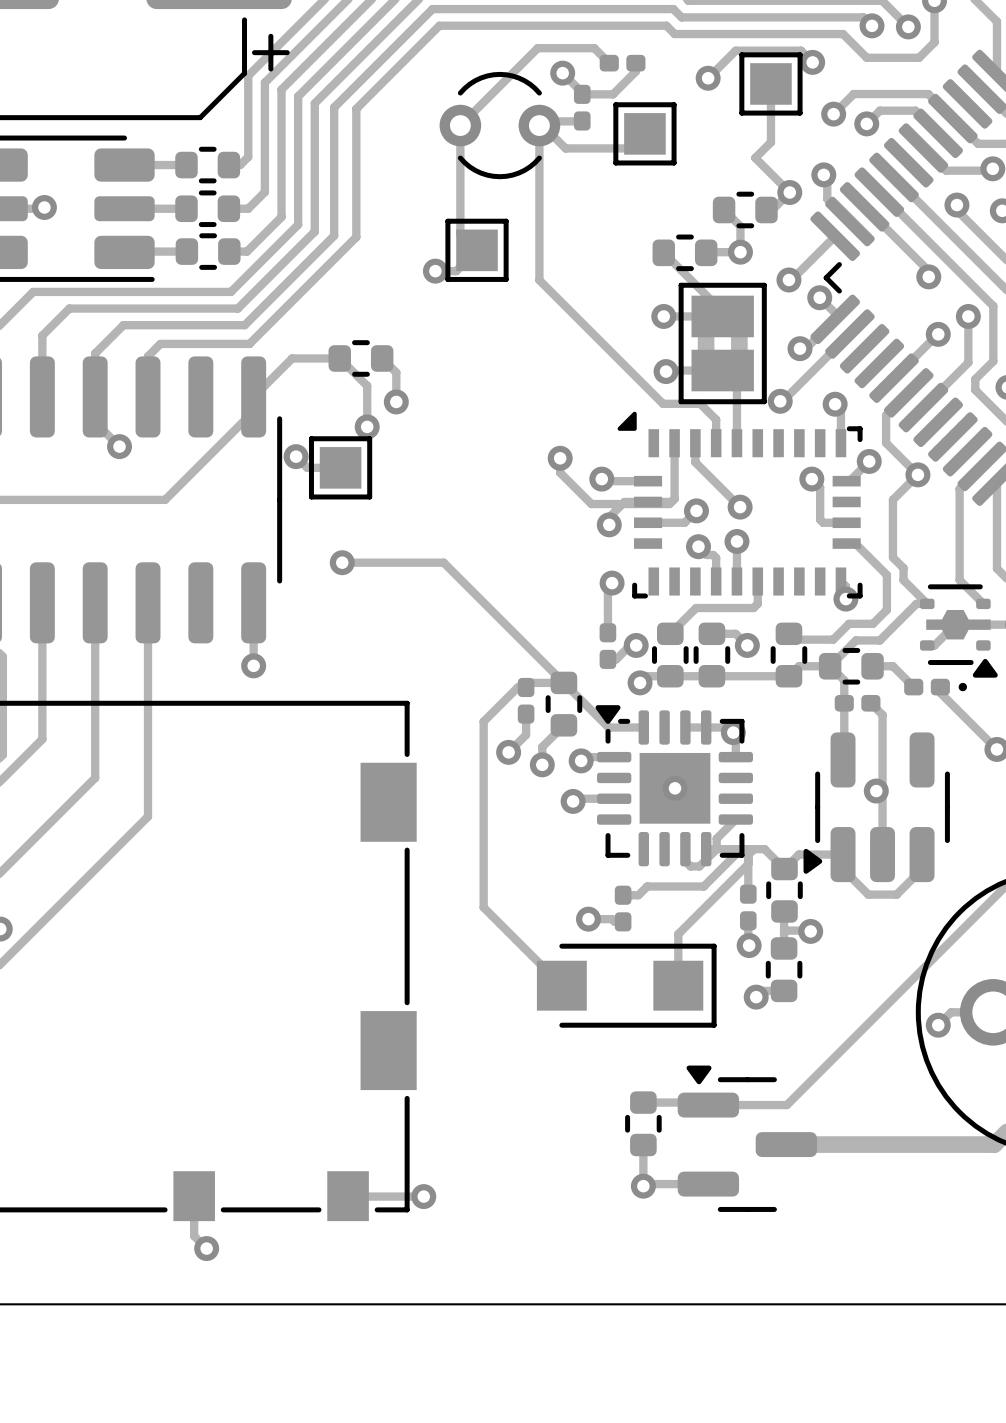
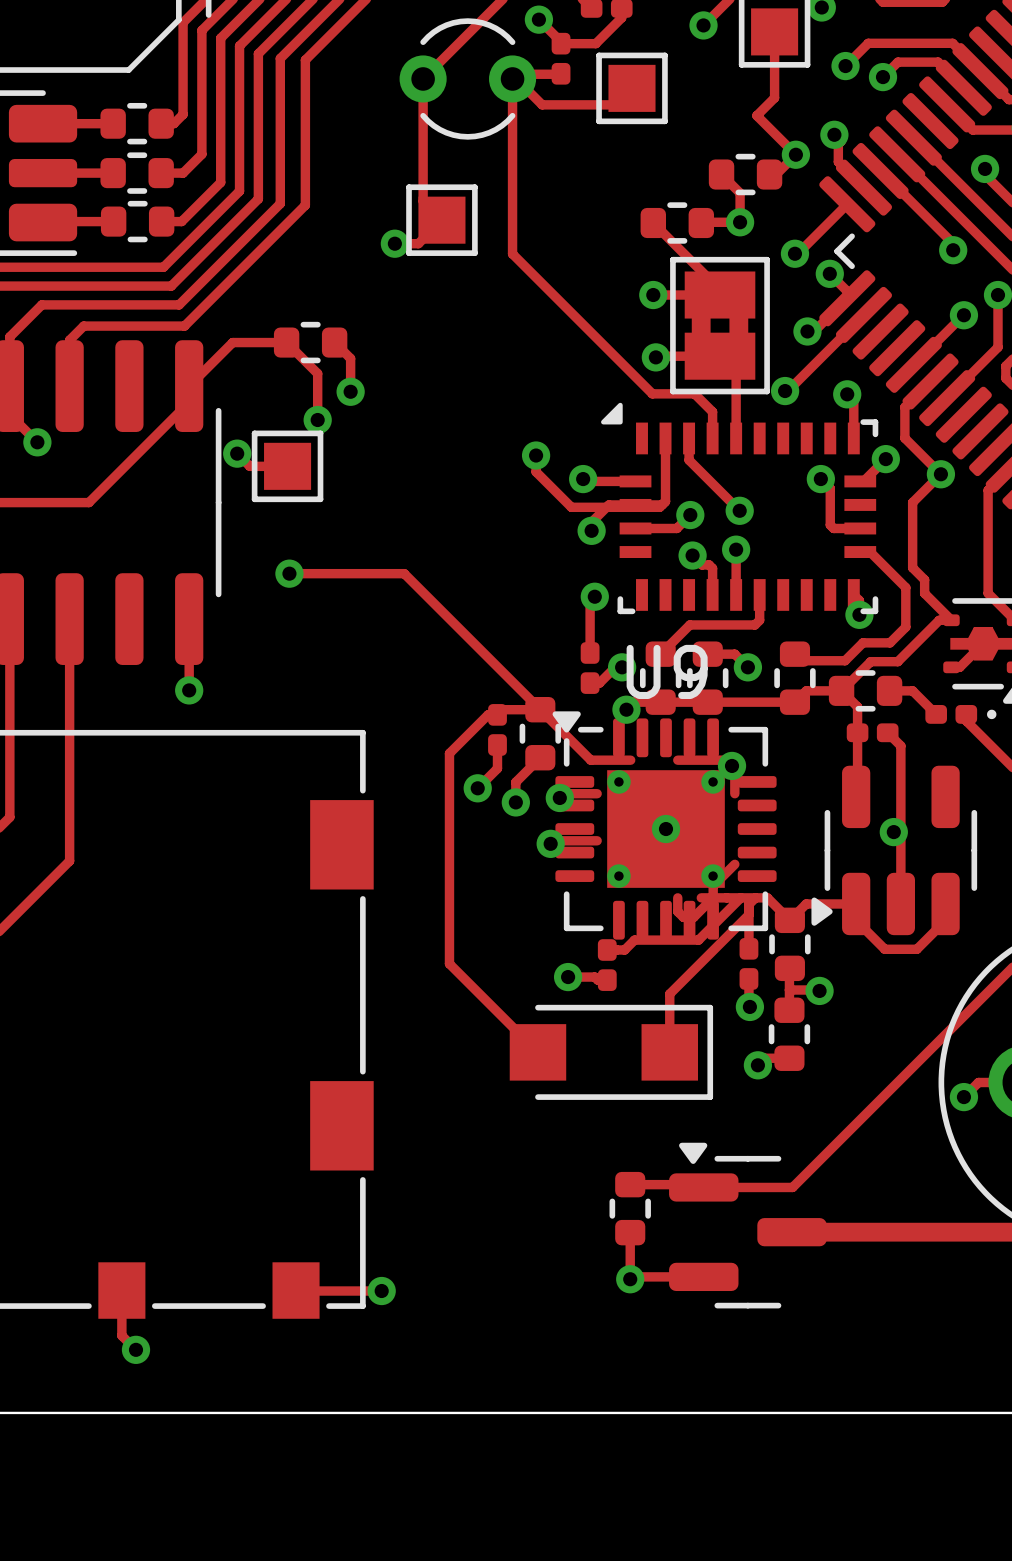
U9: none -> (664, 825)
part: (674, 785) -> none

